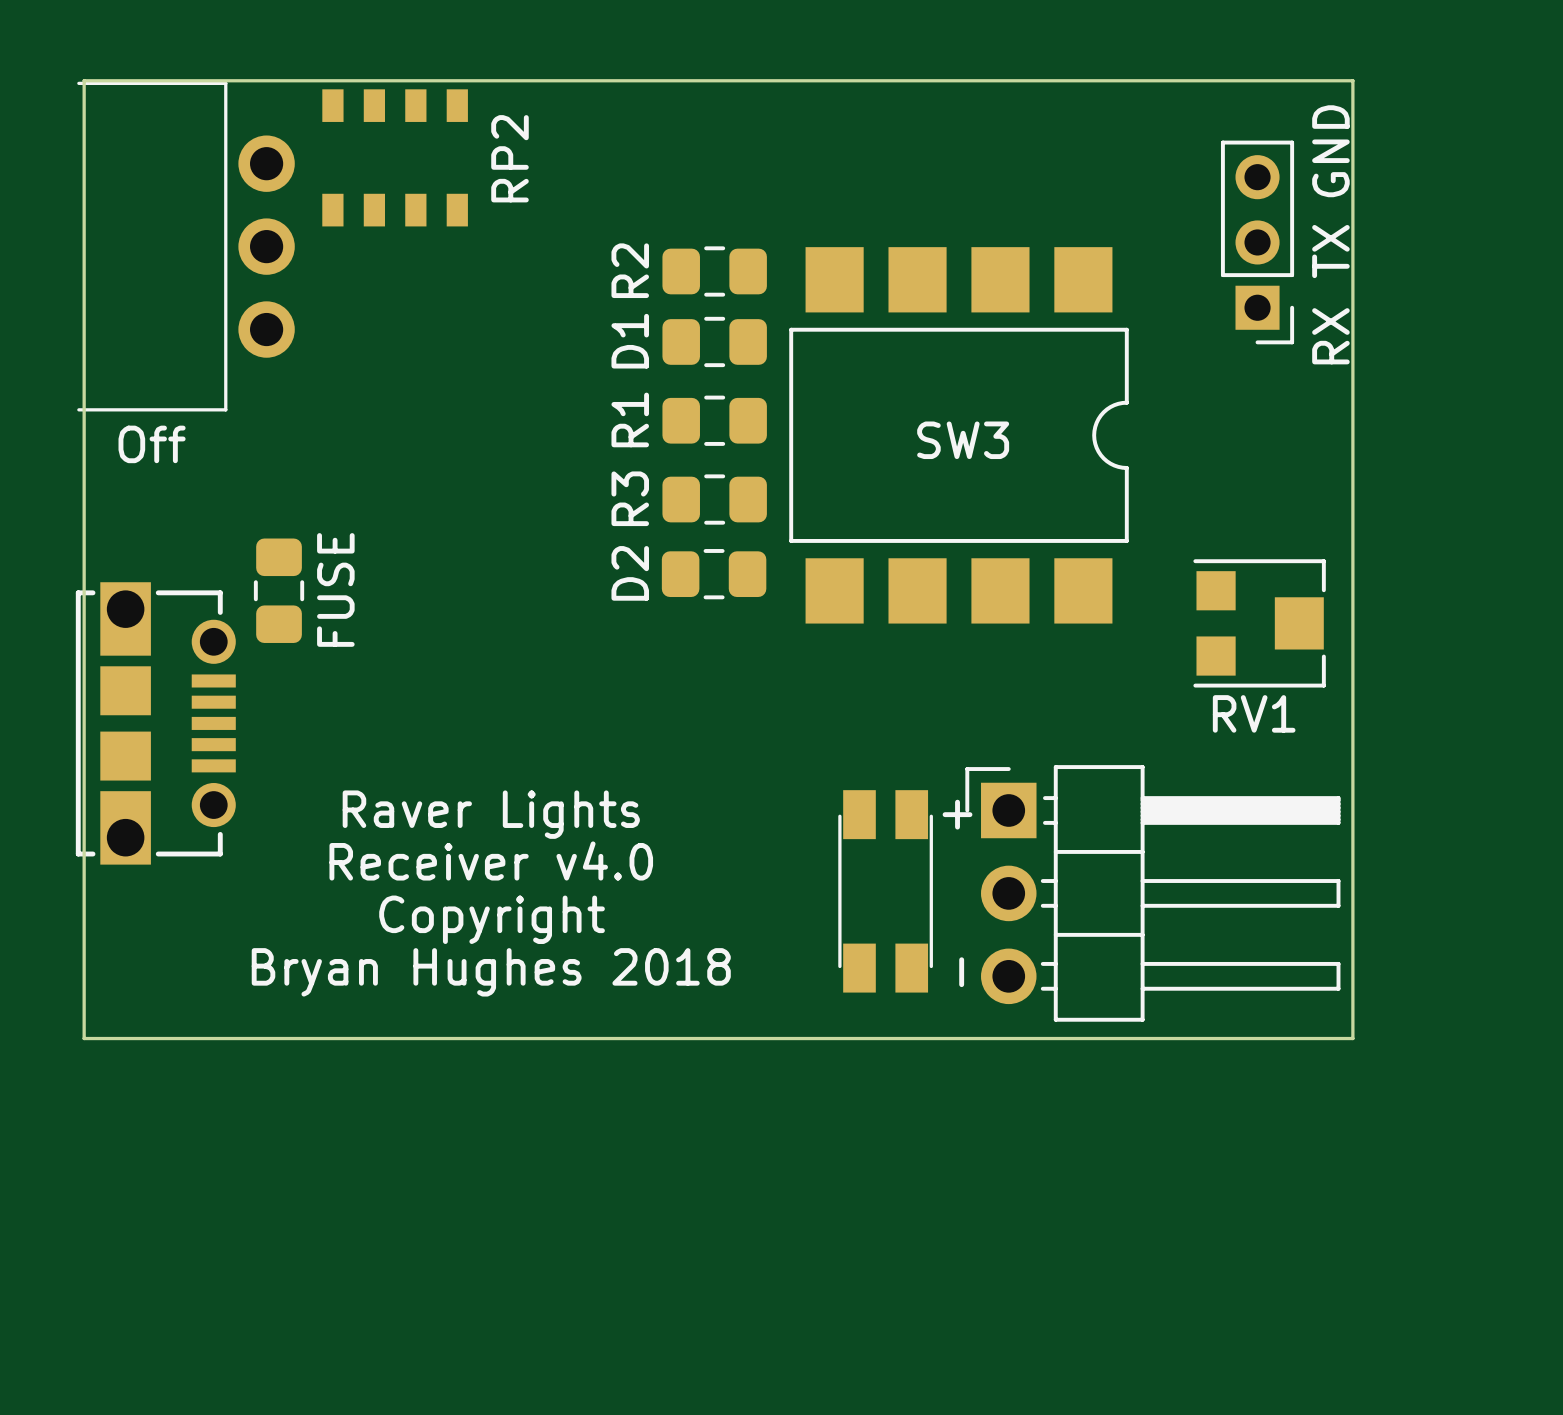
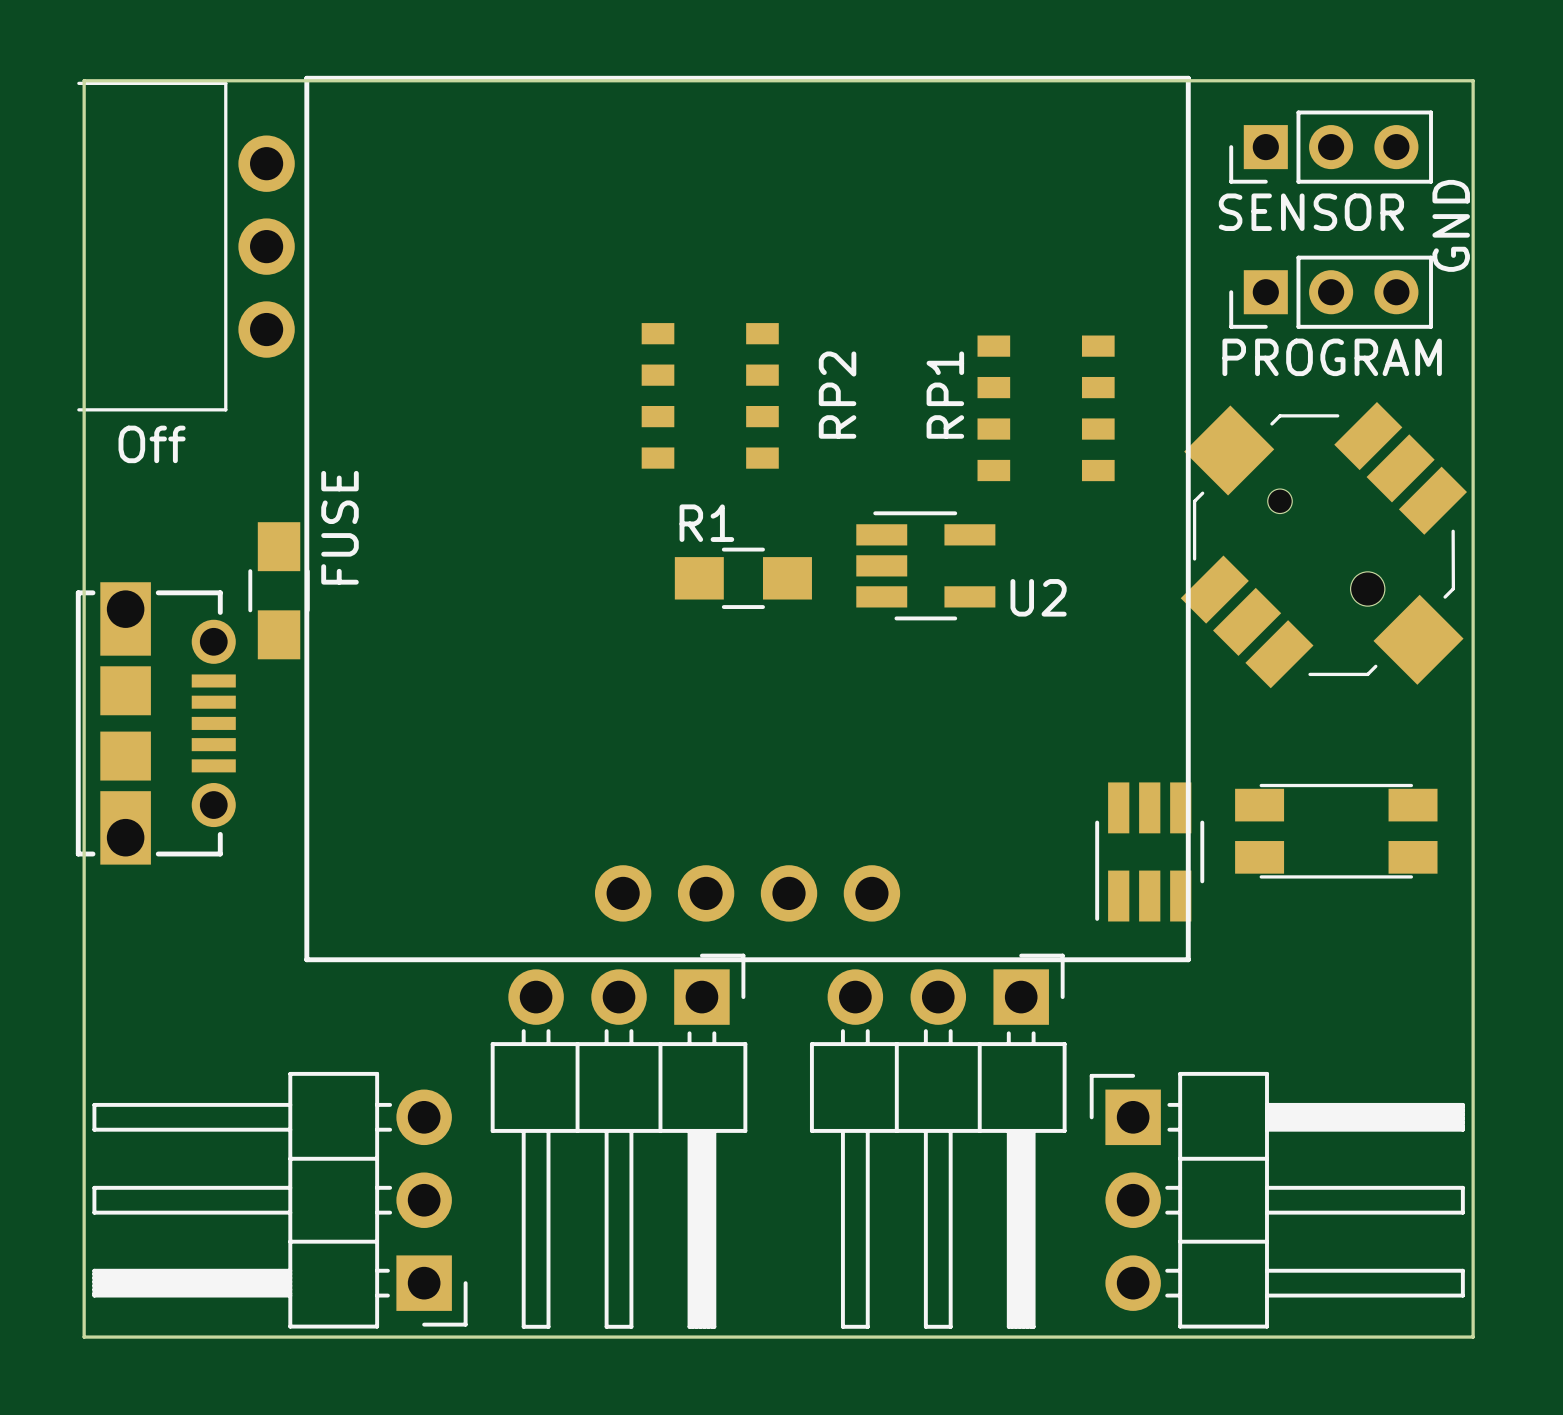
board edge: (1352, 80) (1352, 1038) (84, 1038) -> (1352, 80) (1473, 80) (1473, 1337) (84, 1337) (84, 1038)
part: none -> (1331, 147)
text position: GND (1330, 151) -> GND (1451, 225)
RP2 rotation: 0° (395, 157) -> 90° clockwise (710, 395)
RP2 position: (395, 157) -> (710, 395)
text: none -> SENSOR (1311, 212)
part: (1257, 242) -> none
text: TX (1330, 251) -> none
R2: (714, 271) -> none
part: none -> (1331, 292)
text: RX (1330, 336) -> PROGRAM (1332, 357)
D1: (714, 341) -> none
R1 footprint: [662, 395, 767, 446] -> [674, 547, 812, 609]
RP1: none -> (1046, 408)
R1 name position: R1 (630, 419) -> R1 (706, 523)
SW3: (959, 435) -> none
R3: (714, 499) -> none
part: none -> (747, 519)
part footprint: [253, 538, 305, 643] -> [248, 522, 310, 660]
part: none -> (1323, 545)
U2: none -> (925, 565)
D2: (714, 574) -> none
text position: FUSE (335, 589) -> FUSE (340, 527)
RV1: (1259, 623) -> none
text: Raver Lights (491, 814) -> none
text: + (957, 814) -> none
part: none -> (1149, 851)
text: Receiver v4.0 (491, 860) -> none
part rotation: 0° (885, 891) -> 90° clockwise (1336, 831)
part position: (885, 891) -> (1336, 831)
part: (1152, 893) -> none
text: Copyright (492, 919) -> none
text: Bryan Hughes 2018 (491, 972) -> none
text: - (961, 972) -> none
part: none -> (619, 1141)
part: none -> (938, 1141)
part: none -> (280, 1200)
part: none -> (1277, 1200)

